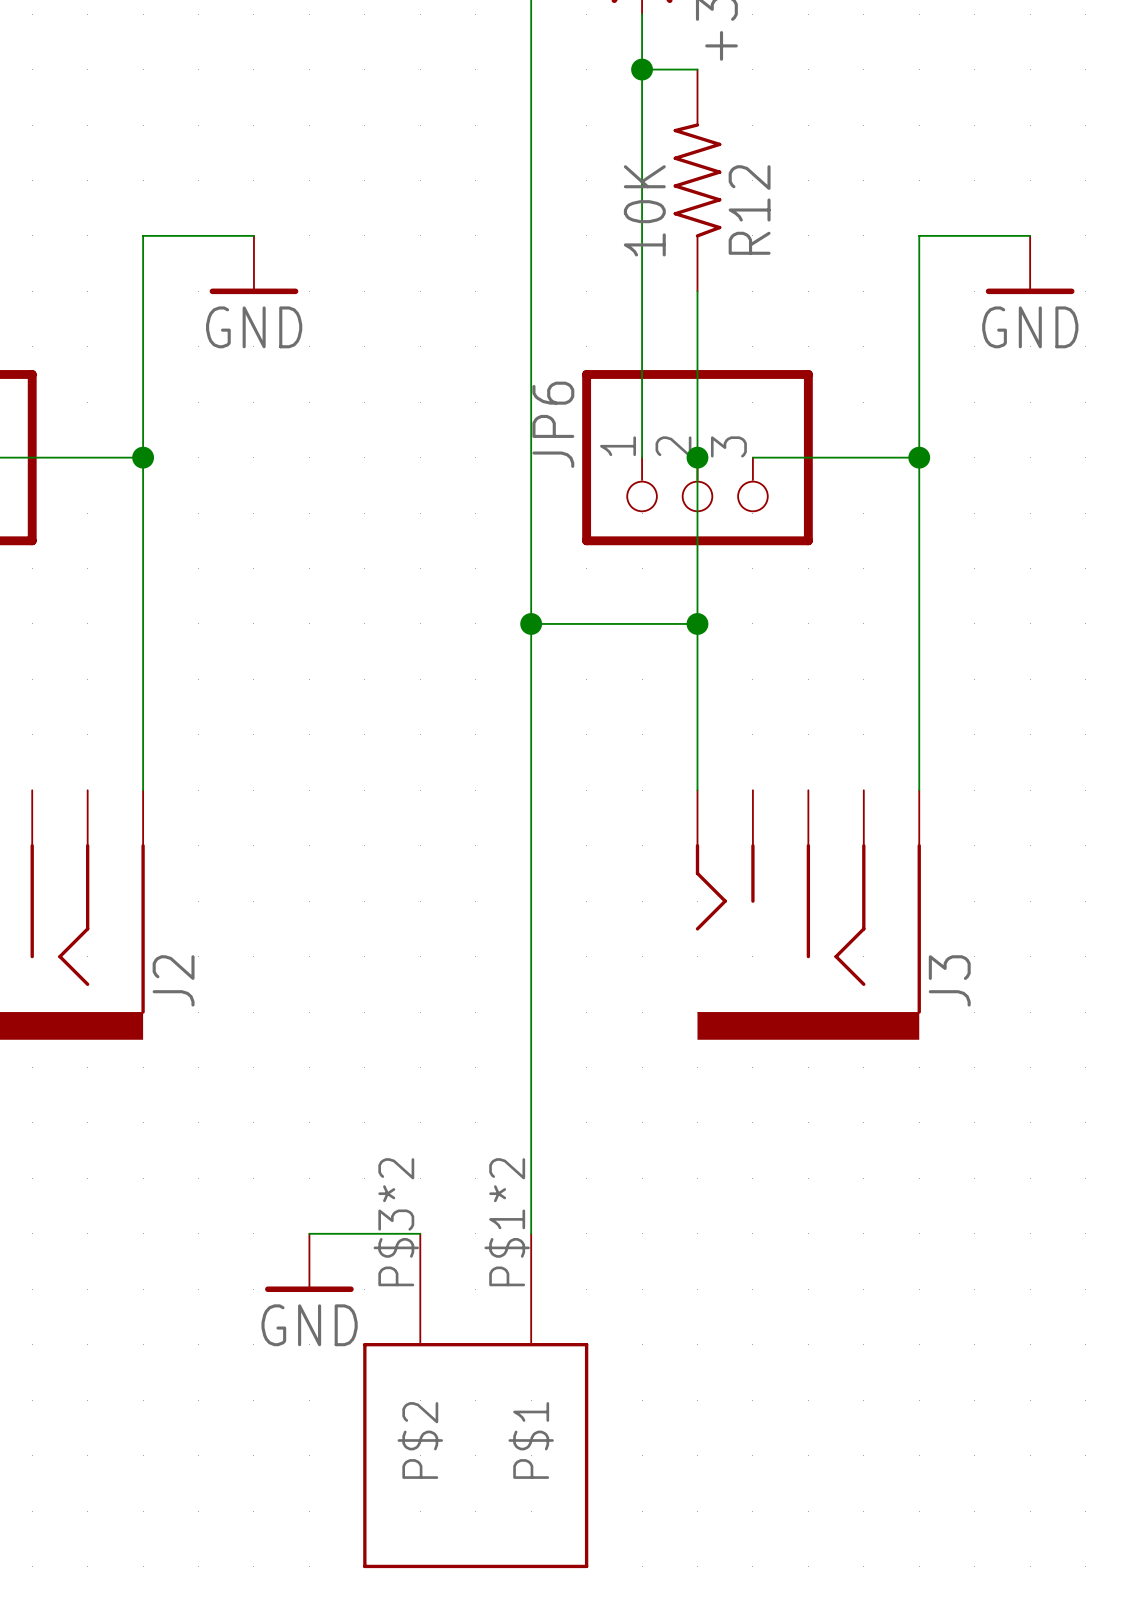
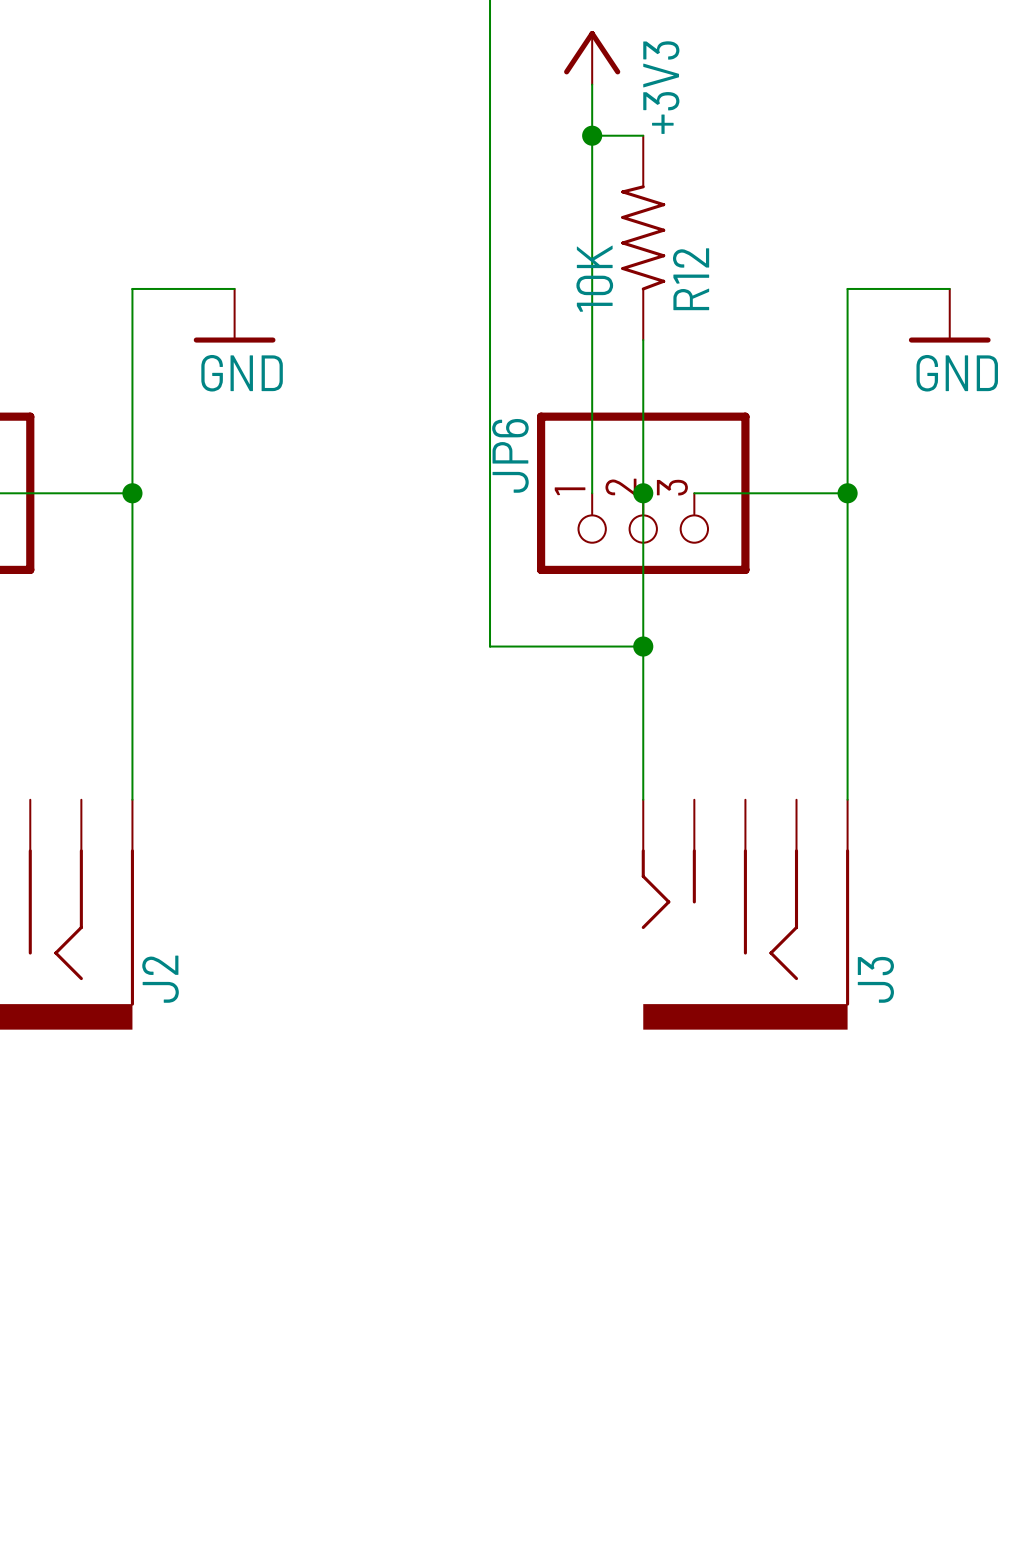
wire: (531, 623) (531, 1233) -> none
junction: (531, 623) -> none
wire: (309, 1233) (420, 1233) -> none
power symbol: GND (309, 1262) -> none
part: (475, 1400) -> none

